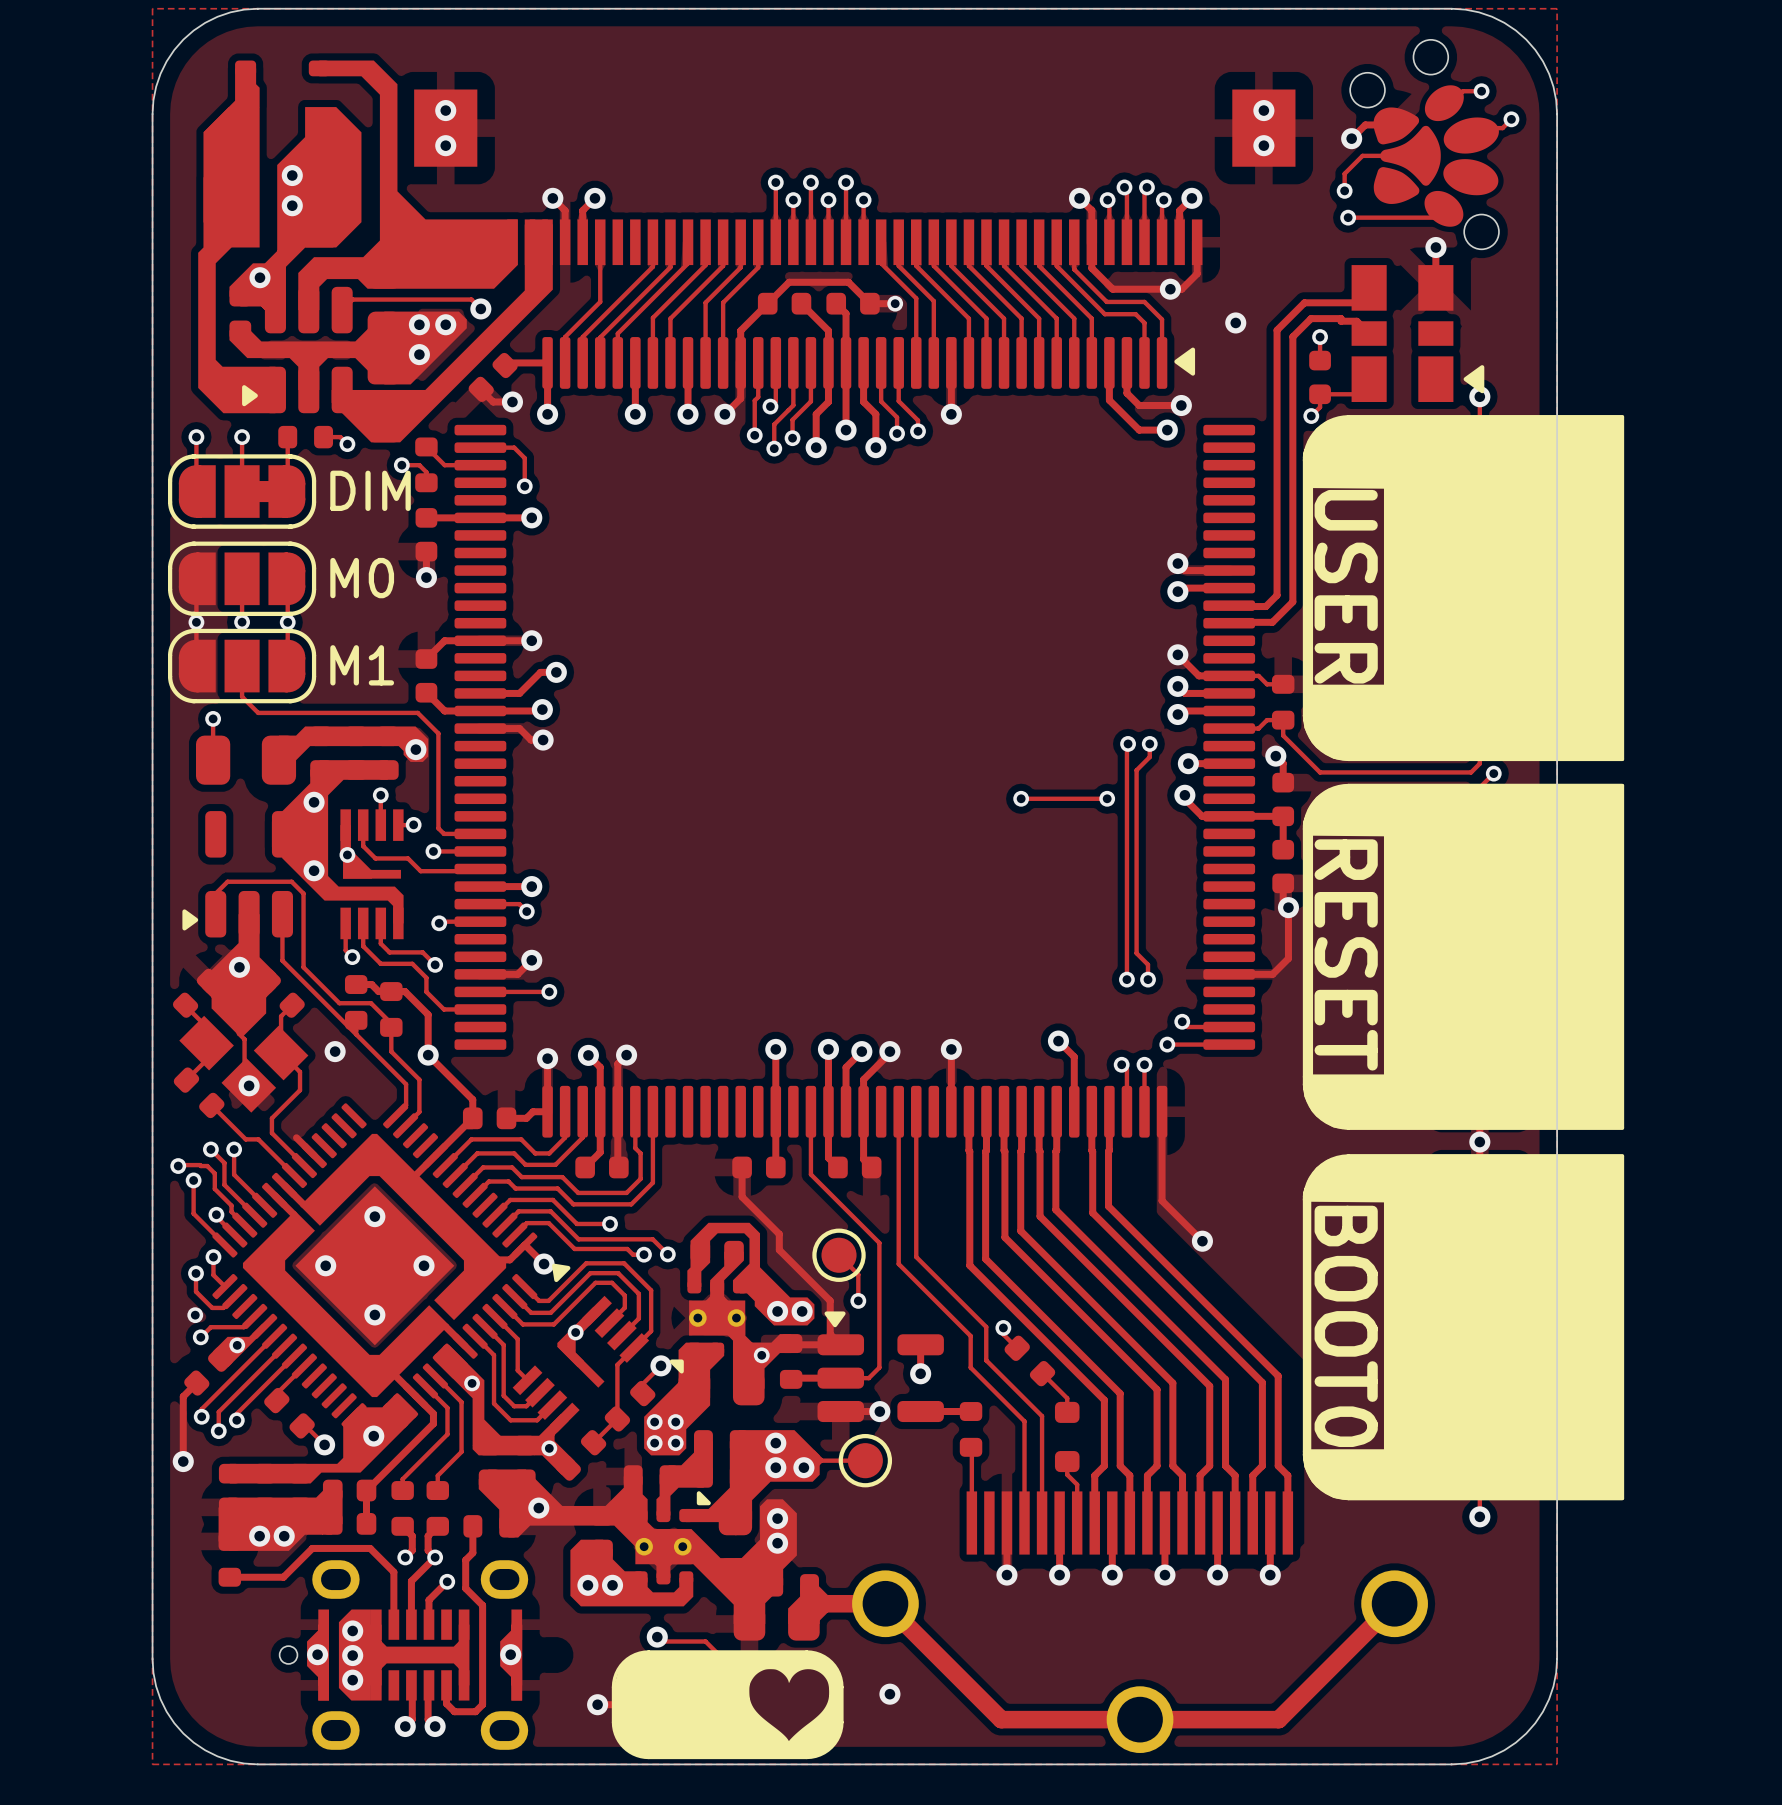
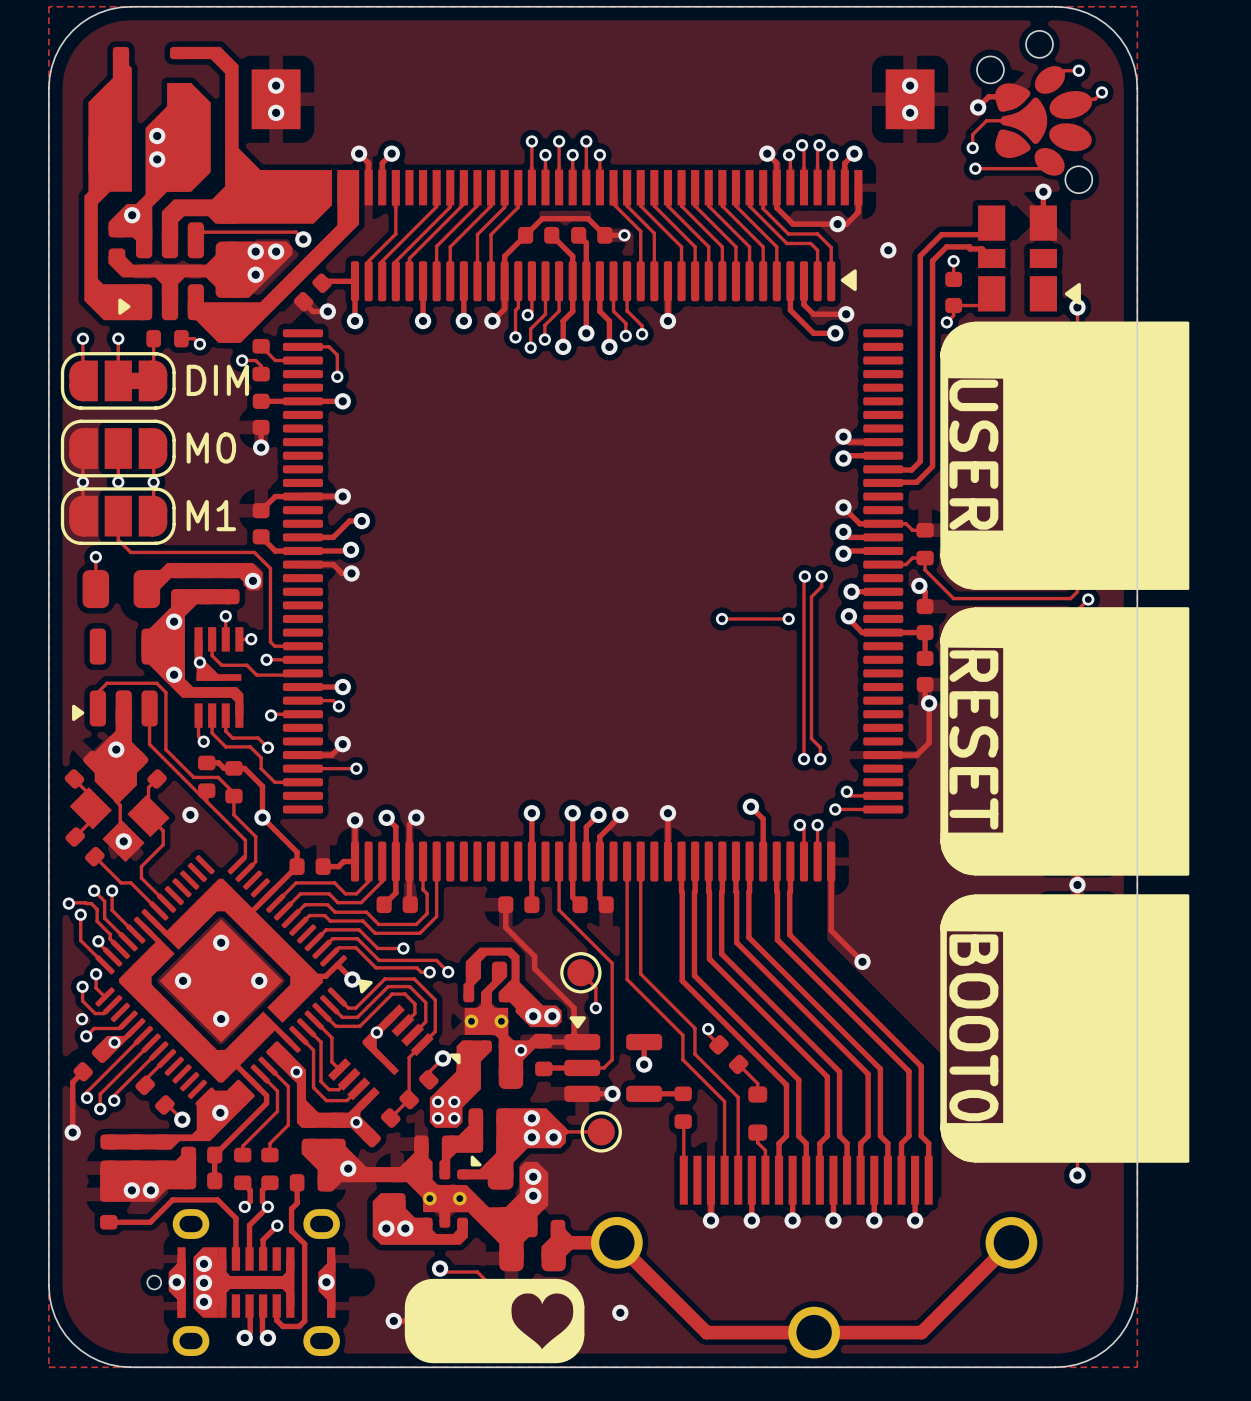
track: (296, 1137) (314, 1155) -> none

